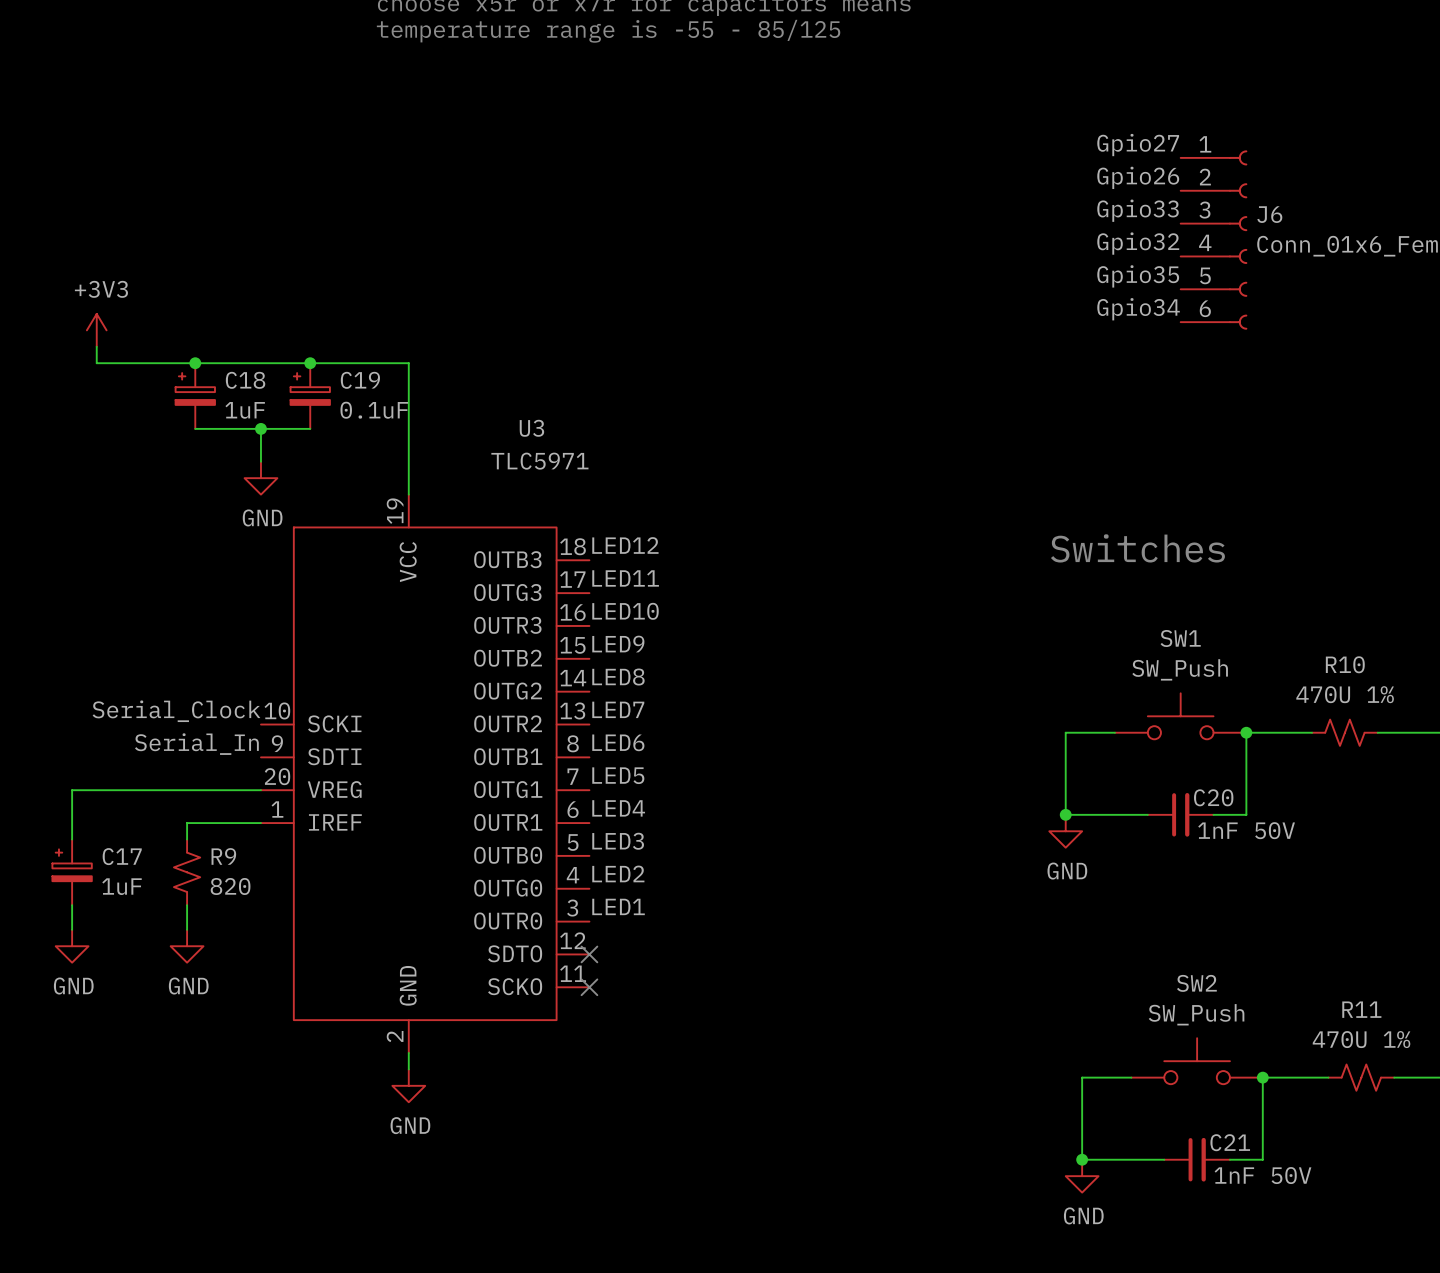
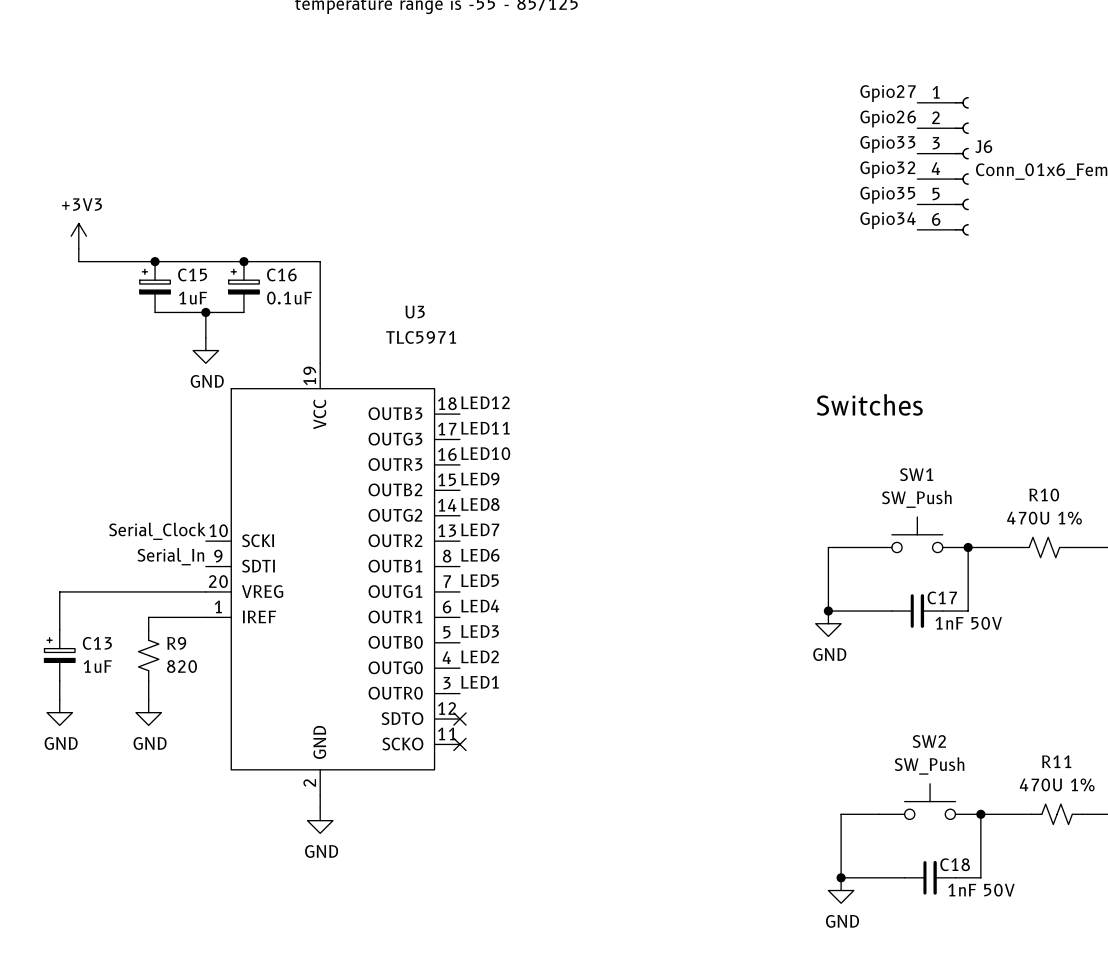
C18 name: C18 (245, 380) -> C15 (192, 274)
C19 name: C19 (360, 380) -> C16 (281, 274)
C20 name: C20 (1213, 797) -> C17 (942, 597)
C17 name: C17 (122, 856) -> C13 (97, 643)
C21 name: C21 (1230, 1142) -> C18 (955, 864)

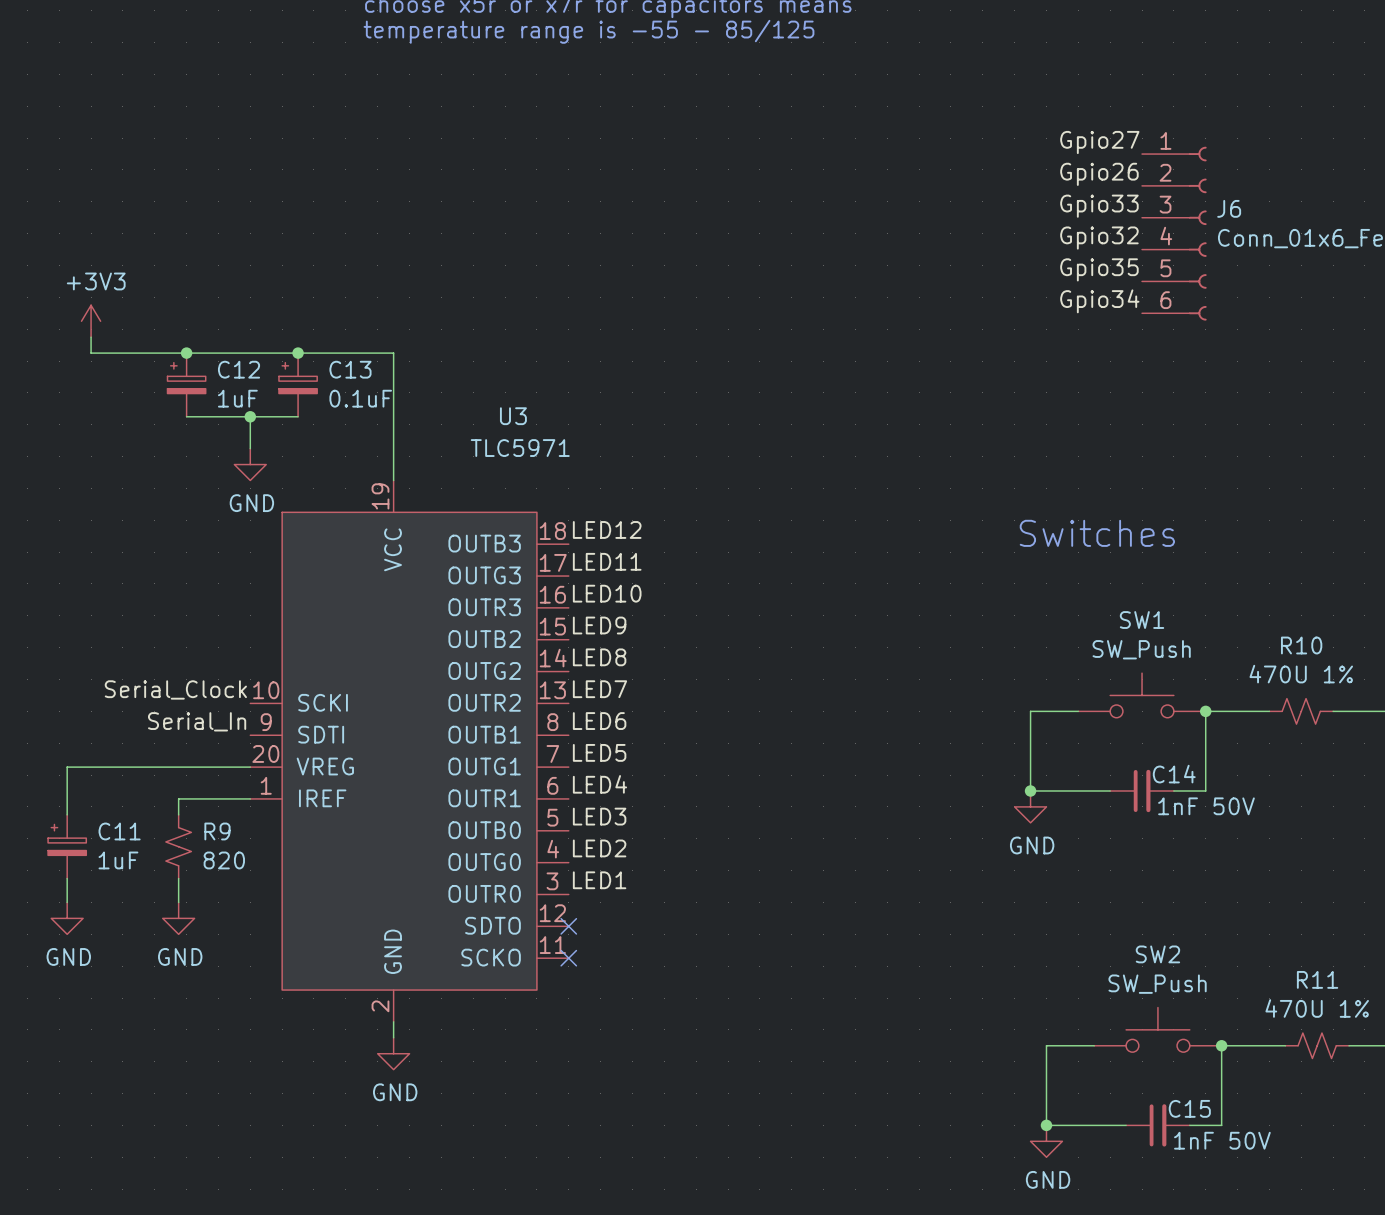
C15 name: C15 (192, 274) -> C12 (239, 369)
C16 name: C16 (281, 274) -> C13 (350, 369)
C17 name: C17 (942, 597) -> C14 (1174, 774)
C13 name: C13 (97, 643) -> C11 (119, 831)
C18 name: C18 (955, 864) -> C15 (1189, 1108)

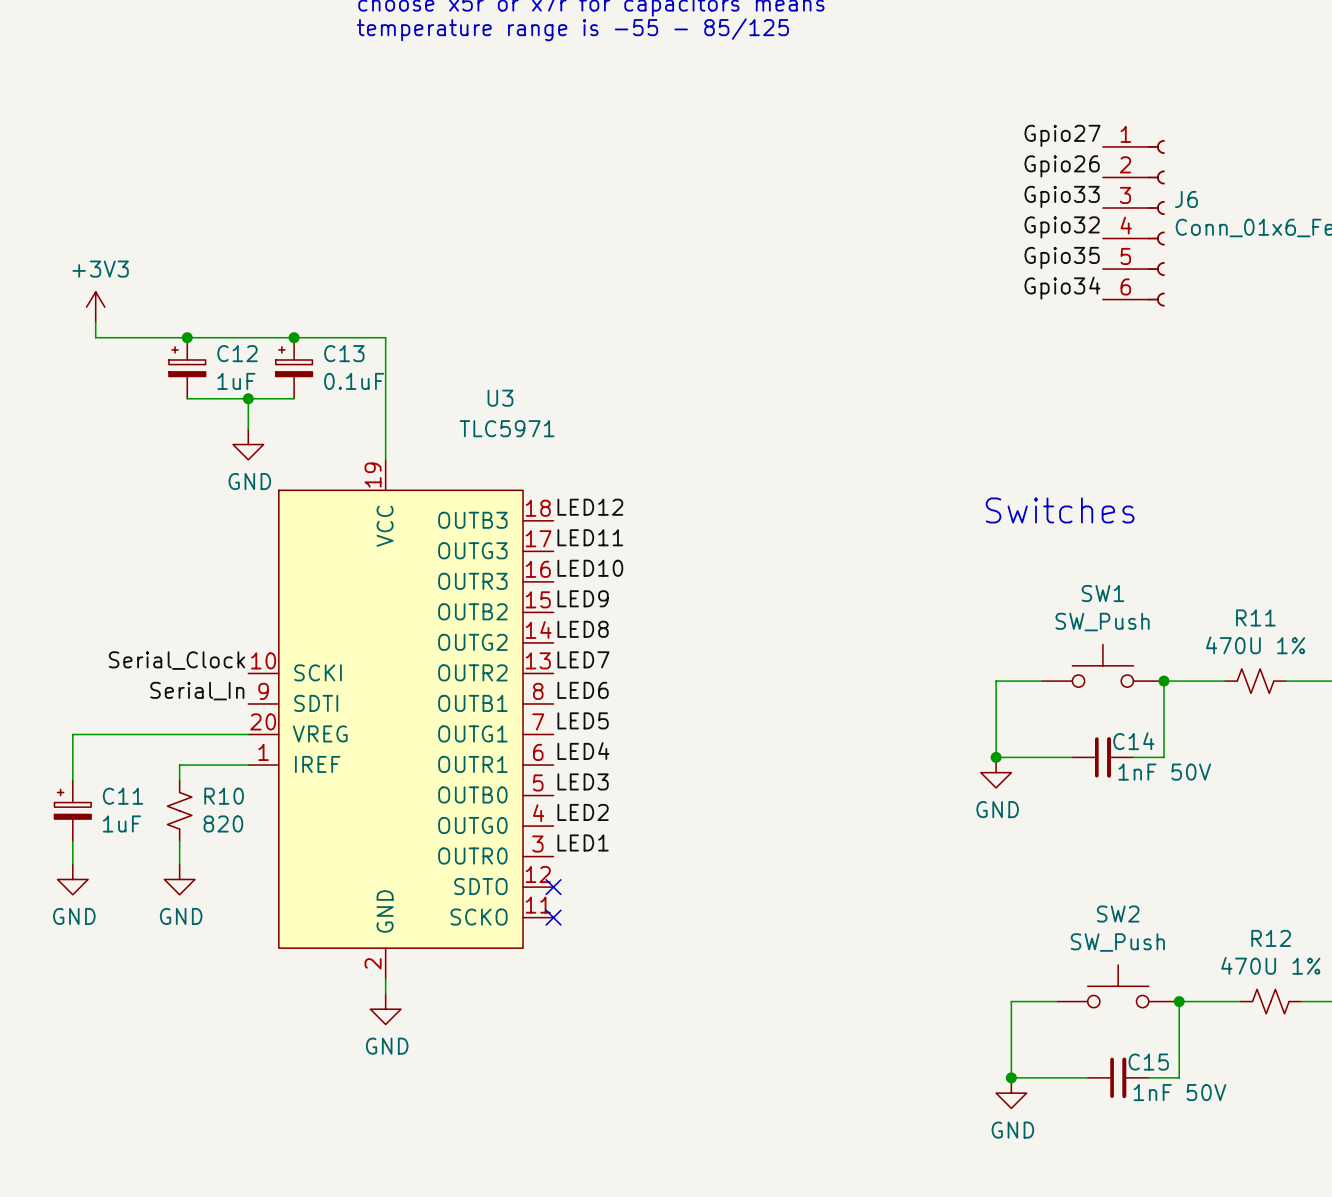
R10 name: R10 (1301, 645) -> R11 (1255, 617)
R9 name: R9 (217, 831) -> R10 (224, 796)
R11 name: R11 (1317, 979) -> R12 (1271, 938)

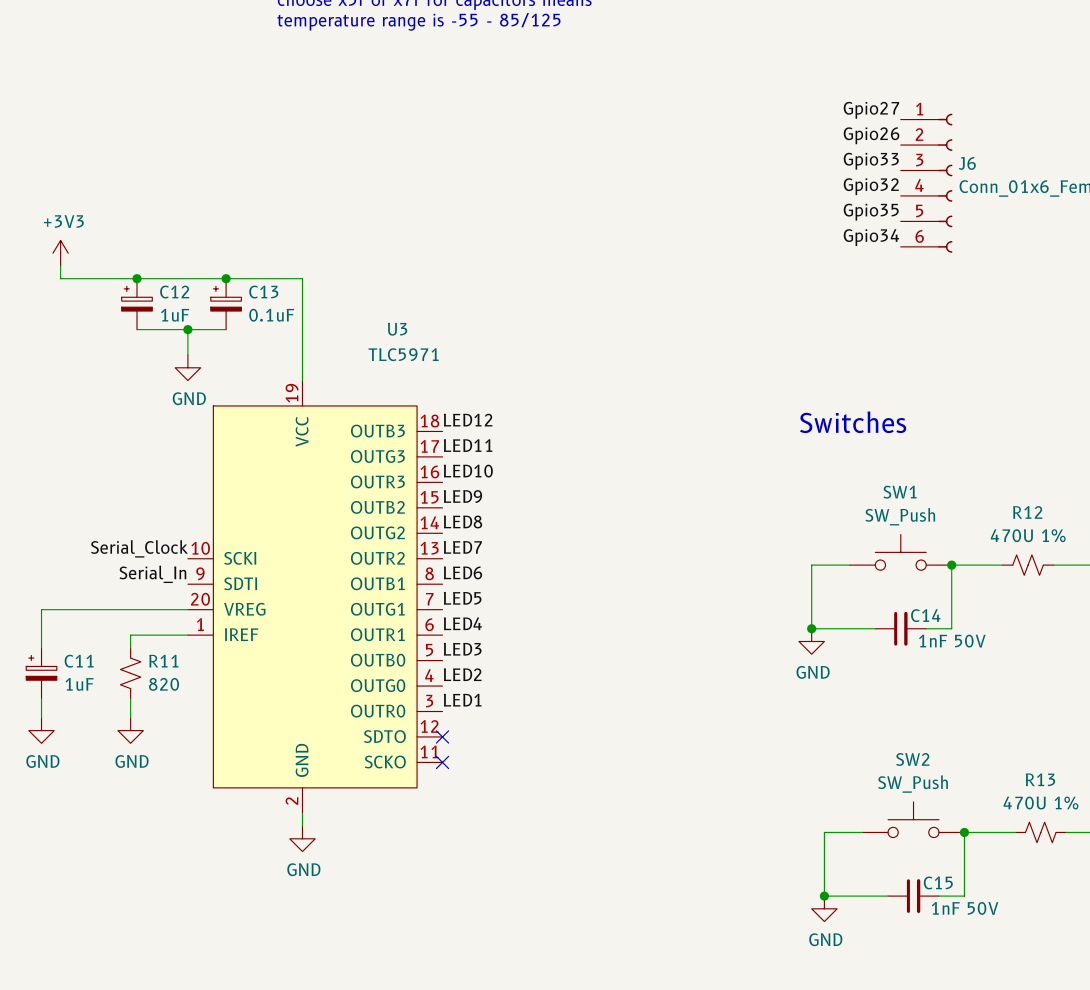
R11 name: R11 (1255, 617) -> R12 (1027, 512)
R10 name: R10 (224, 796) -> R11 (163, 661)
R12 name: R12 (1271, 938) -> R13 (1040, 779)

